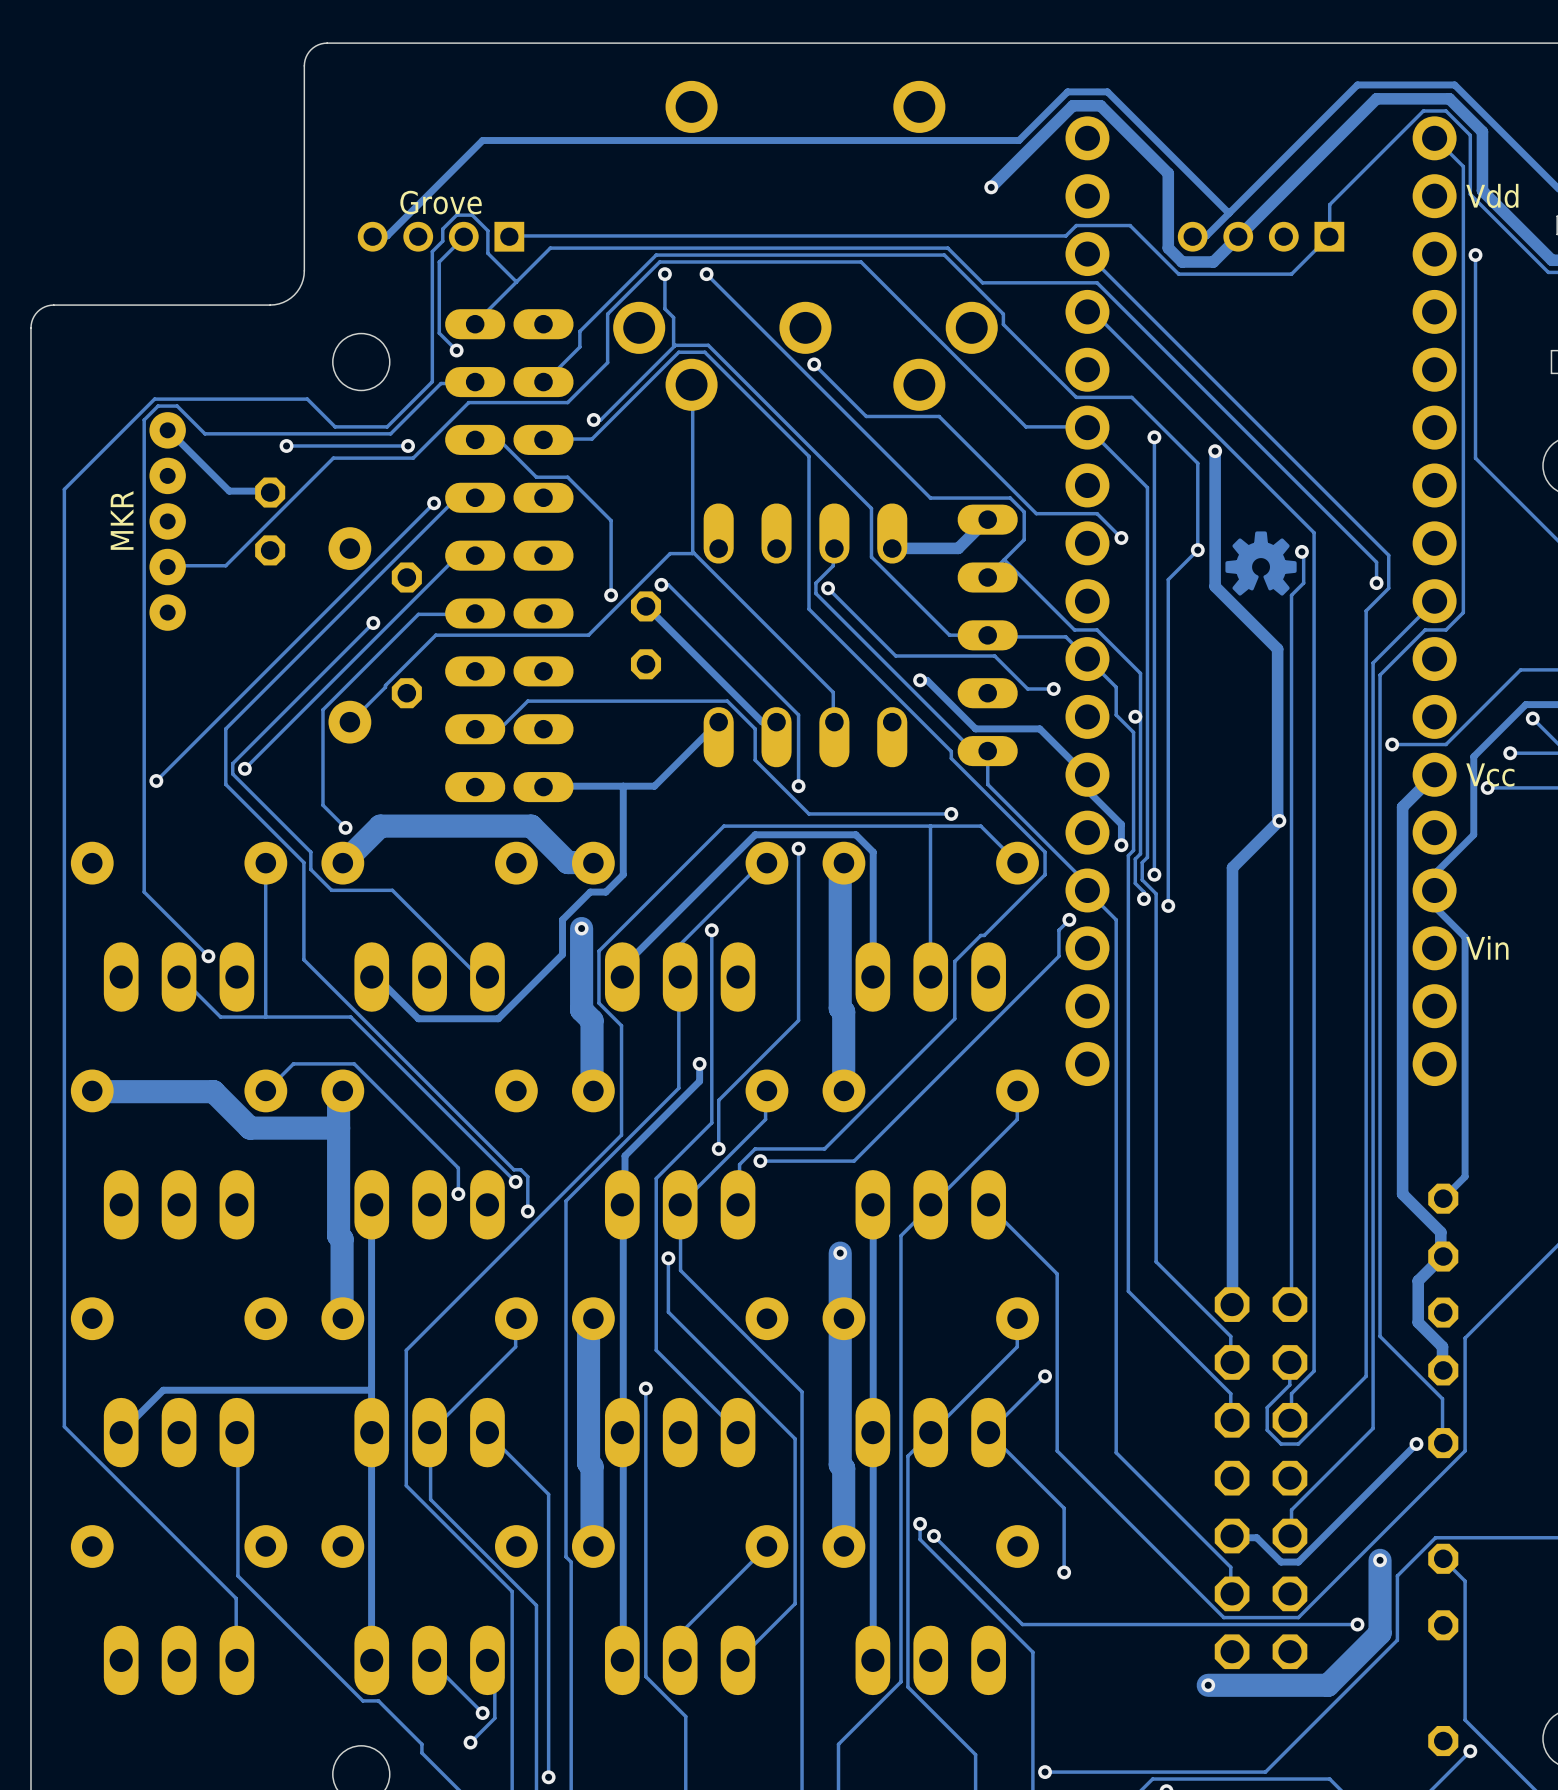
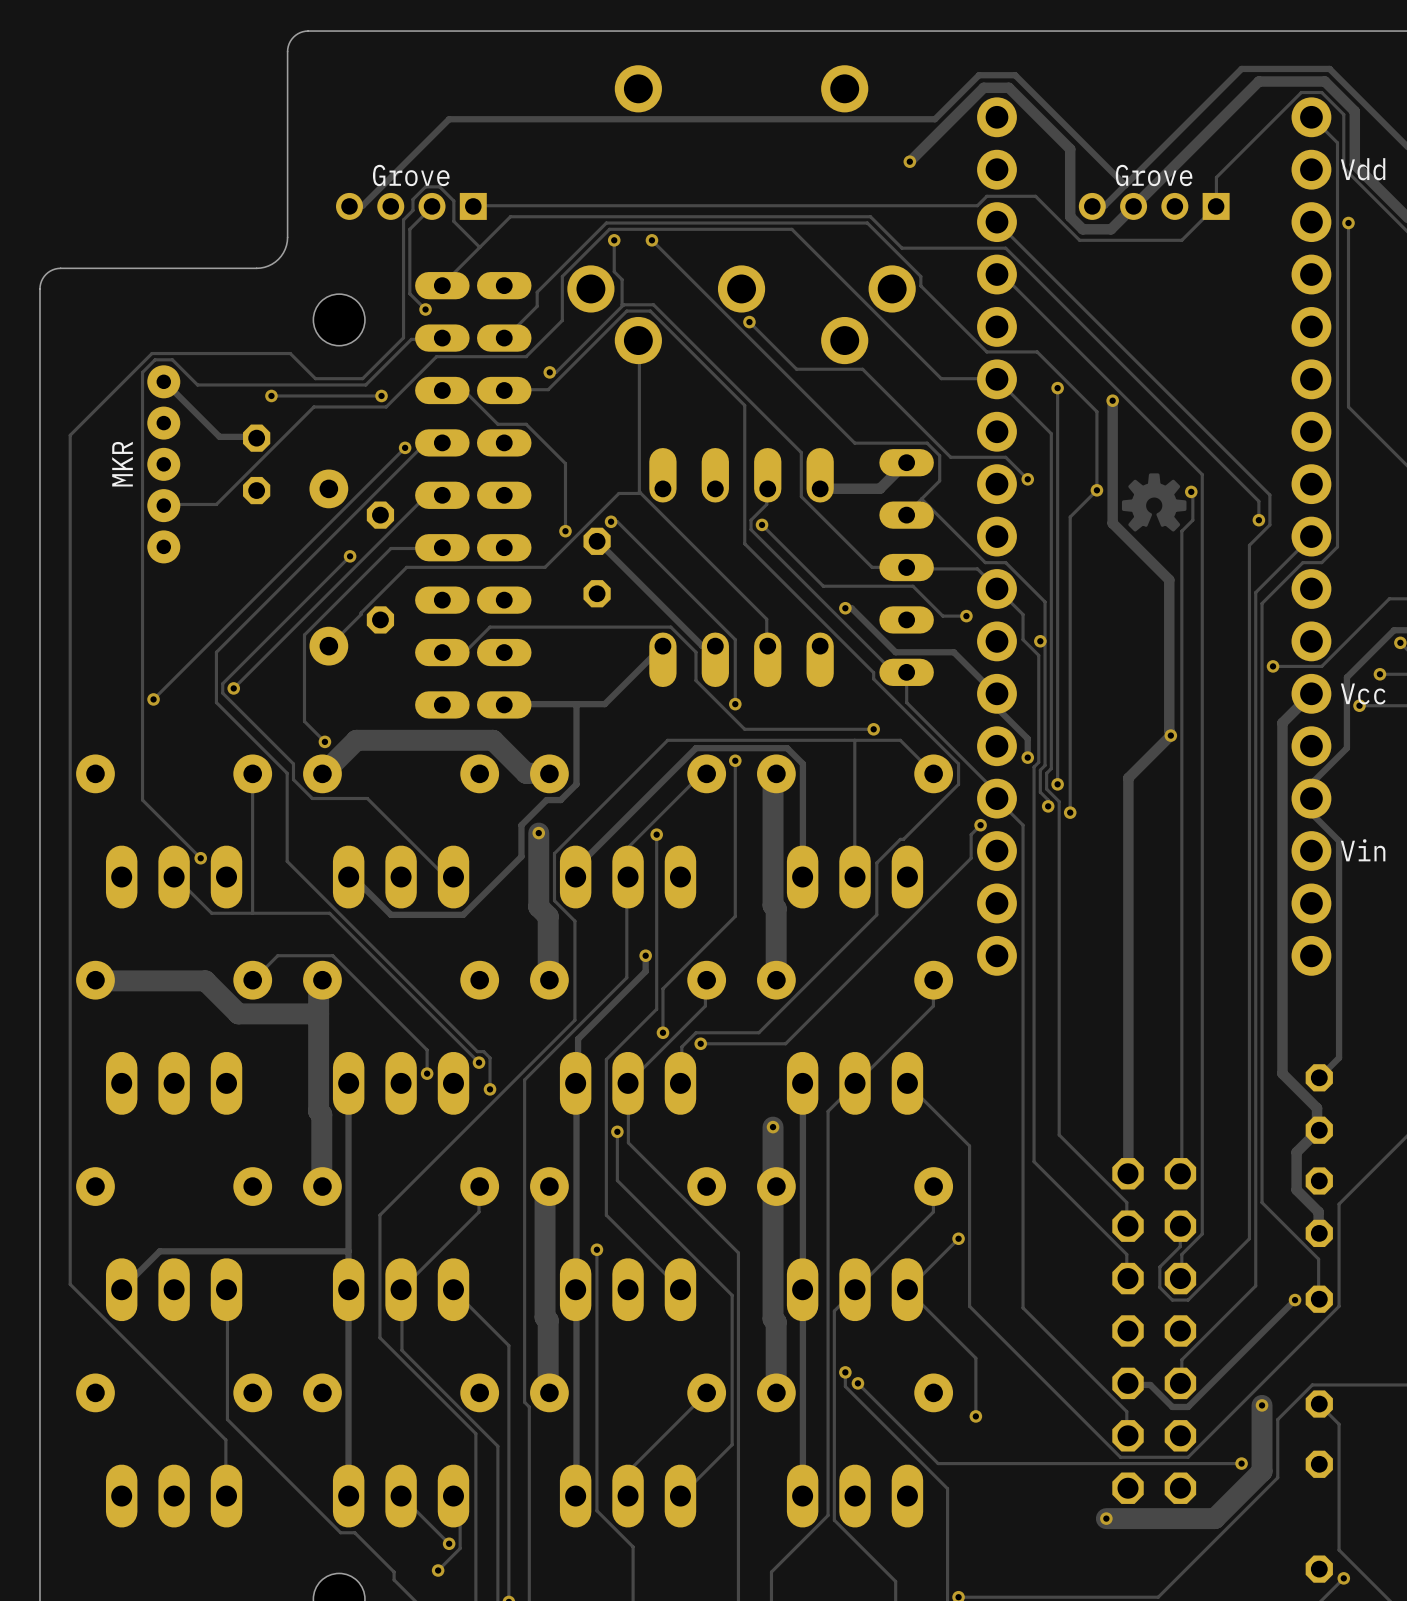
text: none -> Grove (1154, 175)

